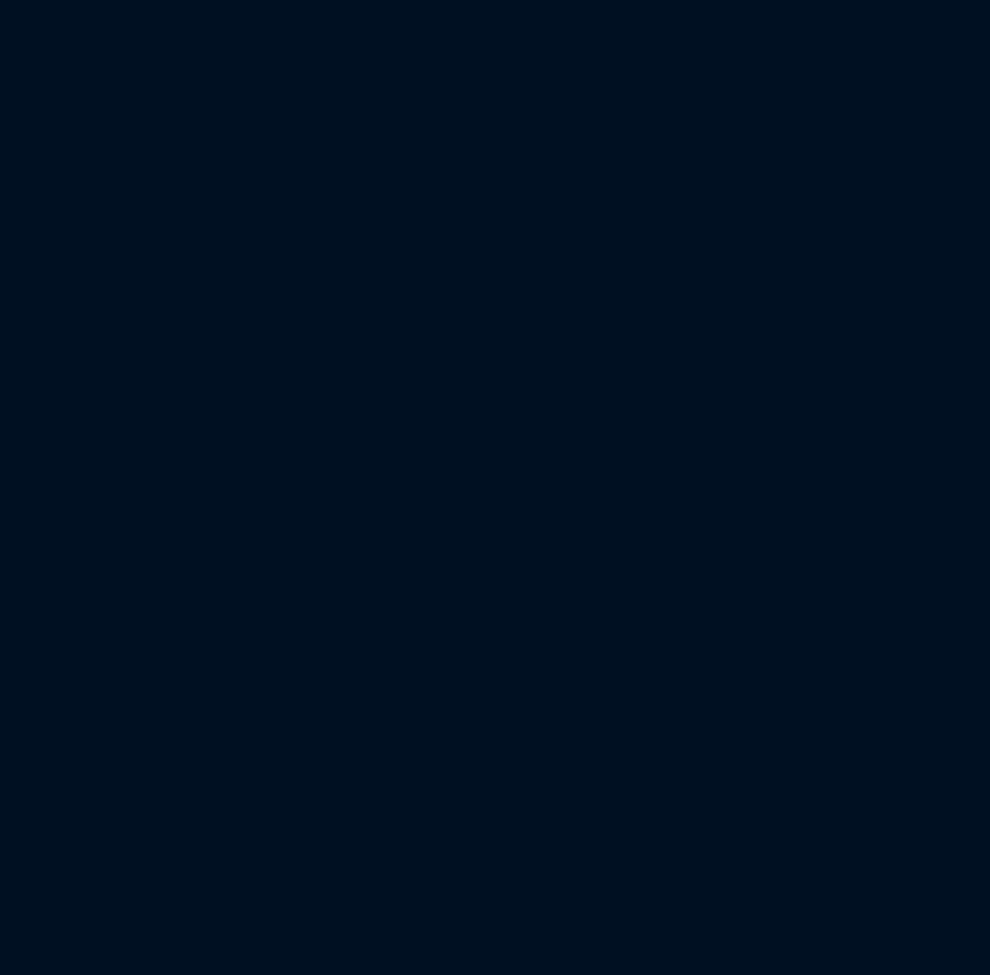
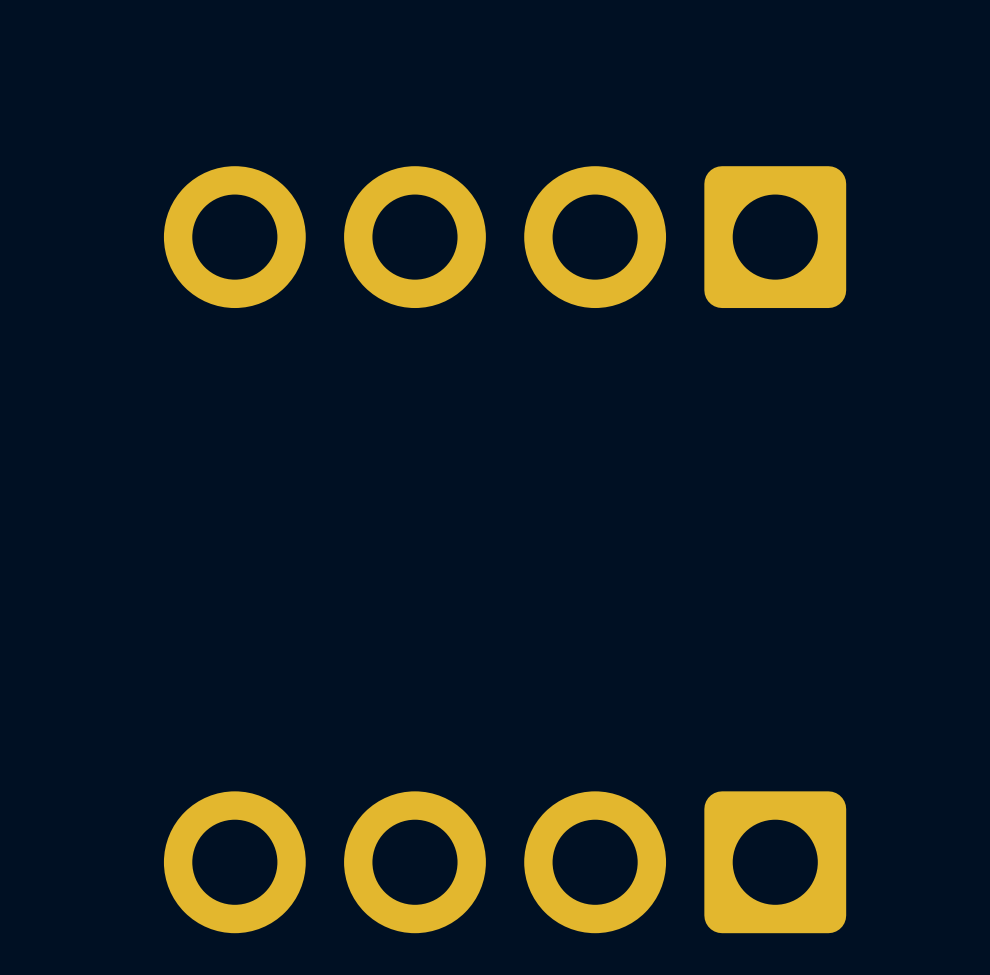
part: none -> (505, 237)
part: none -> (505, 862)

